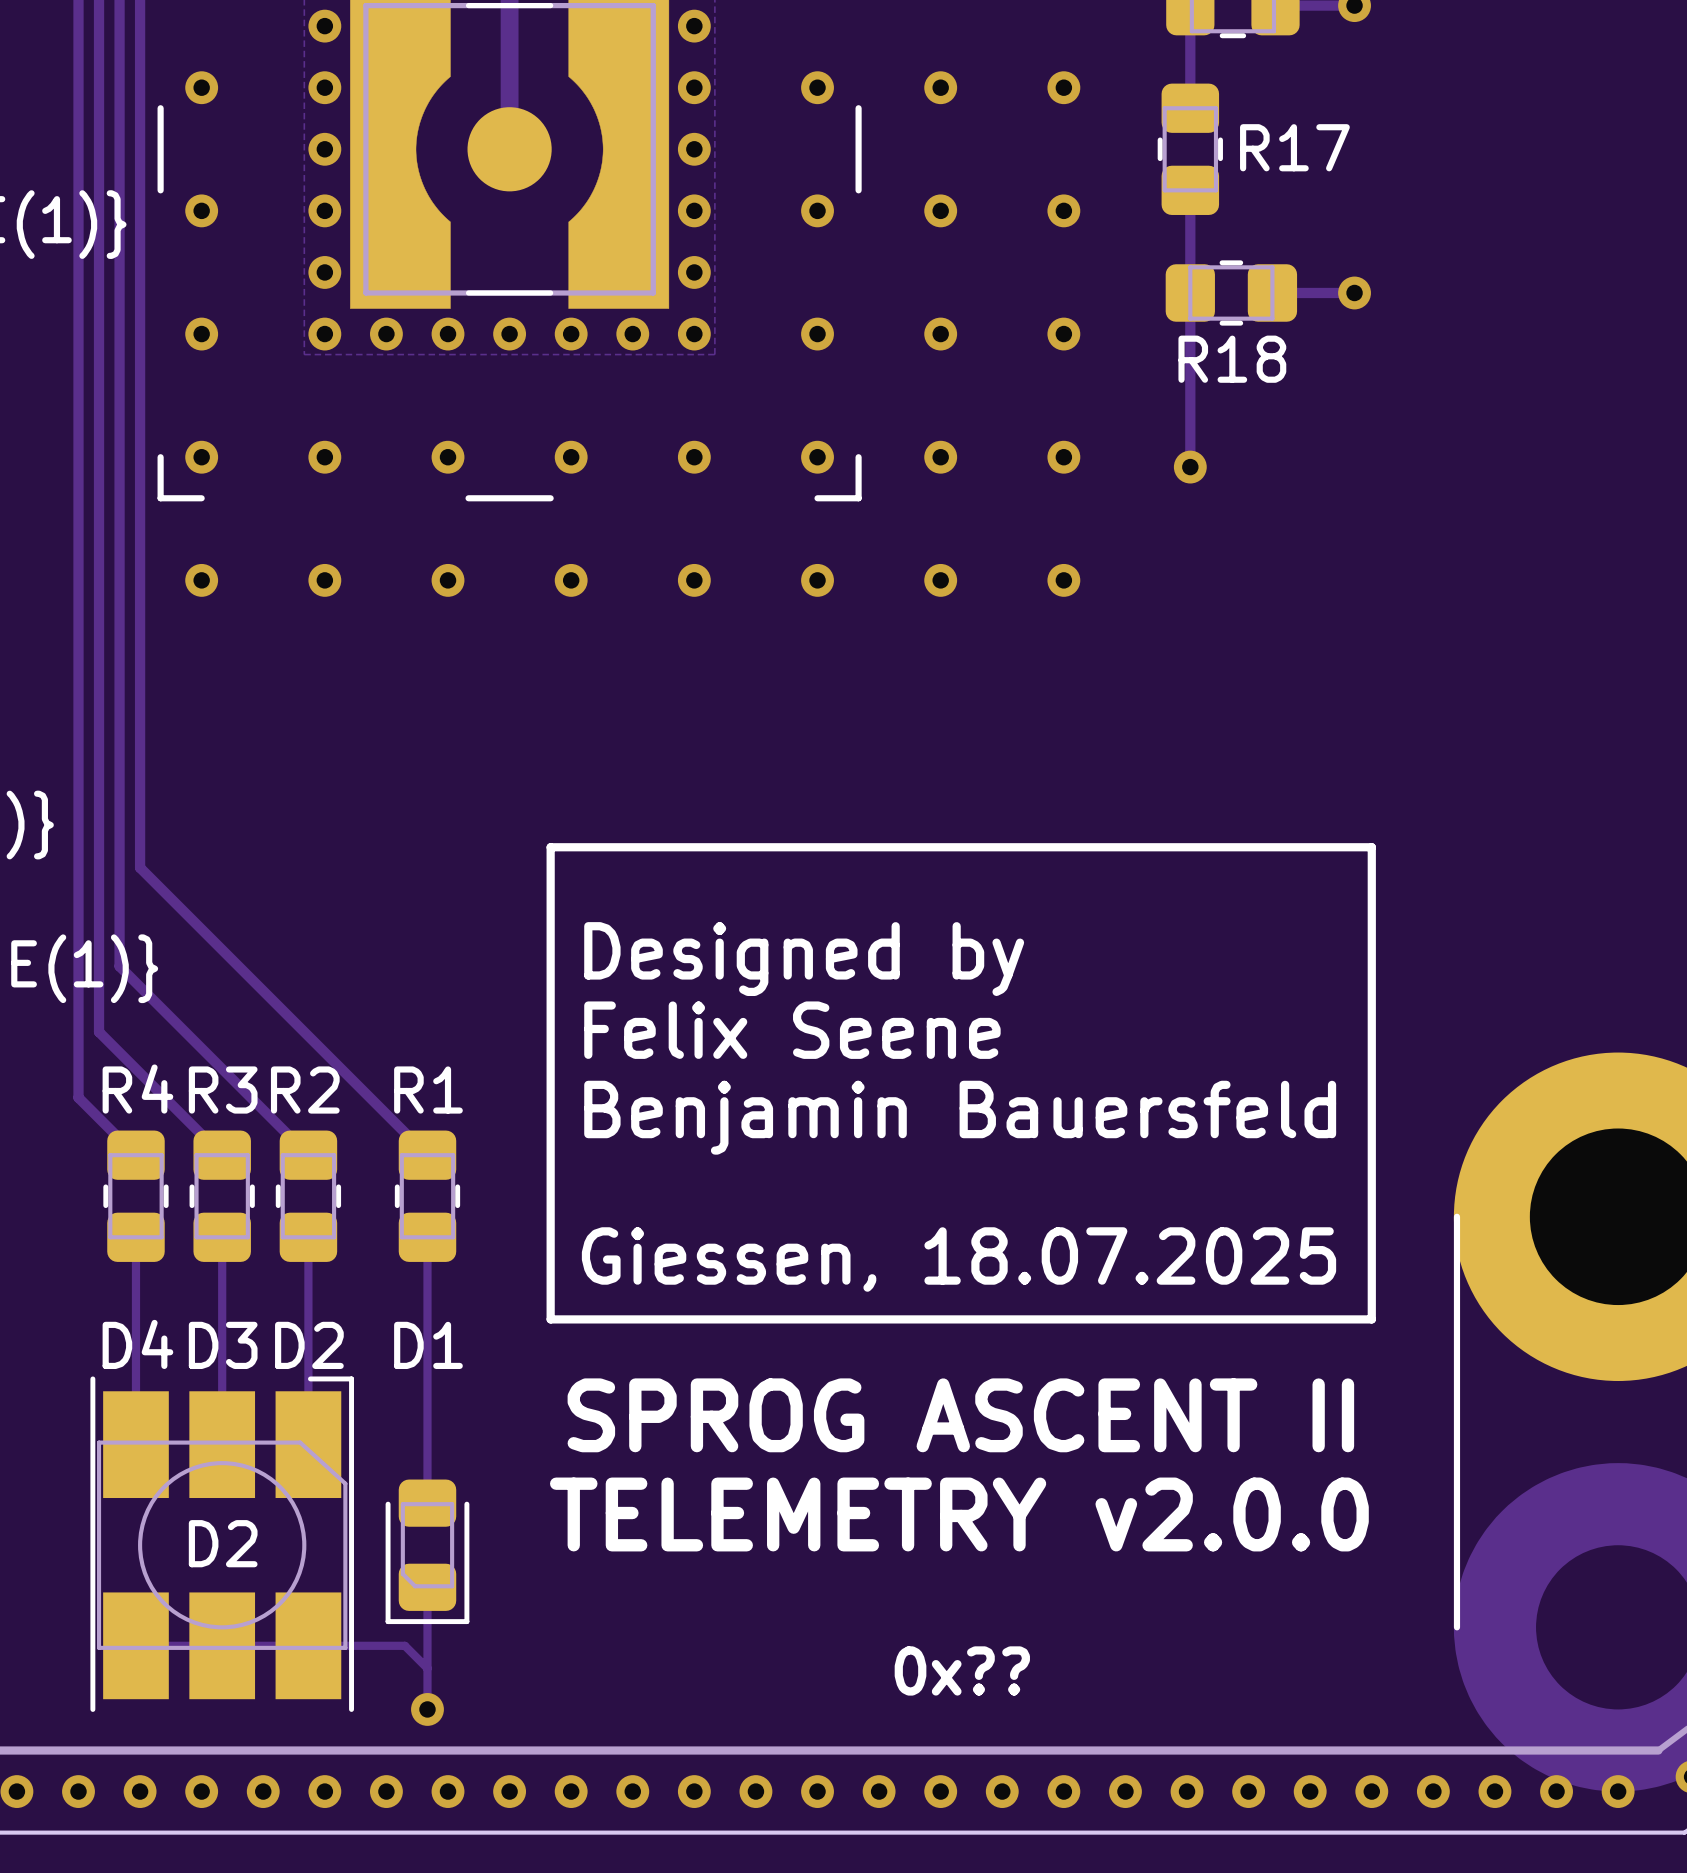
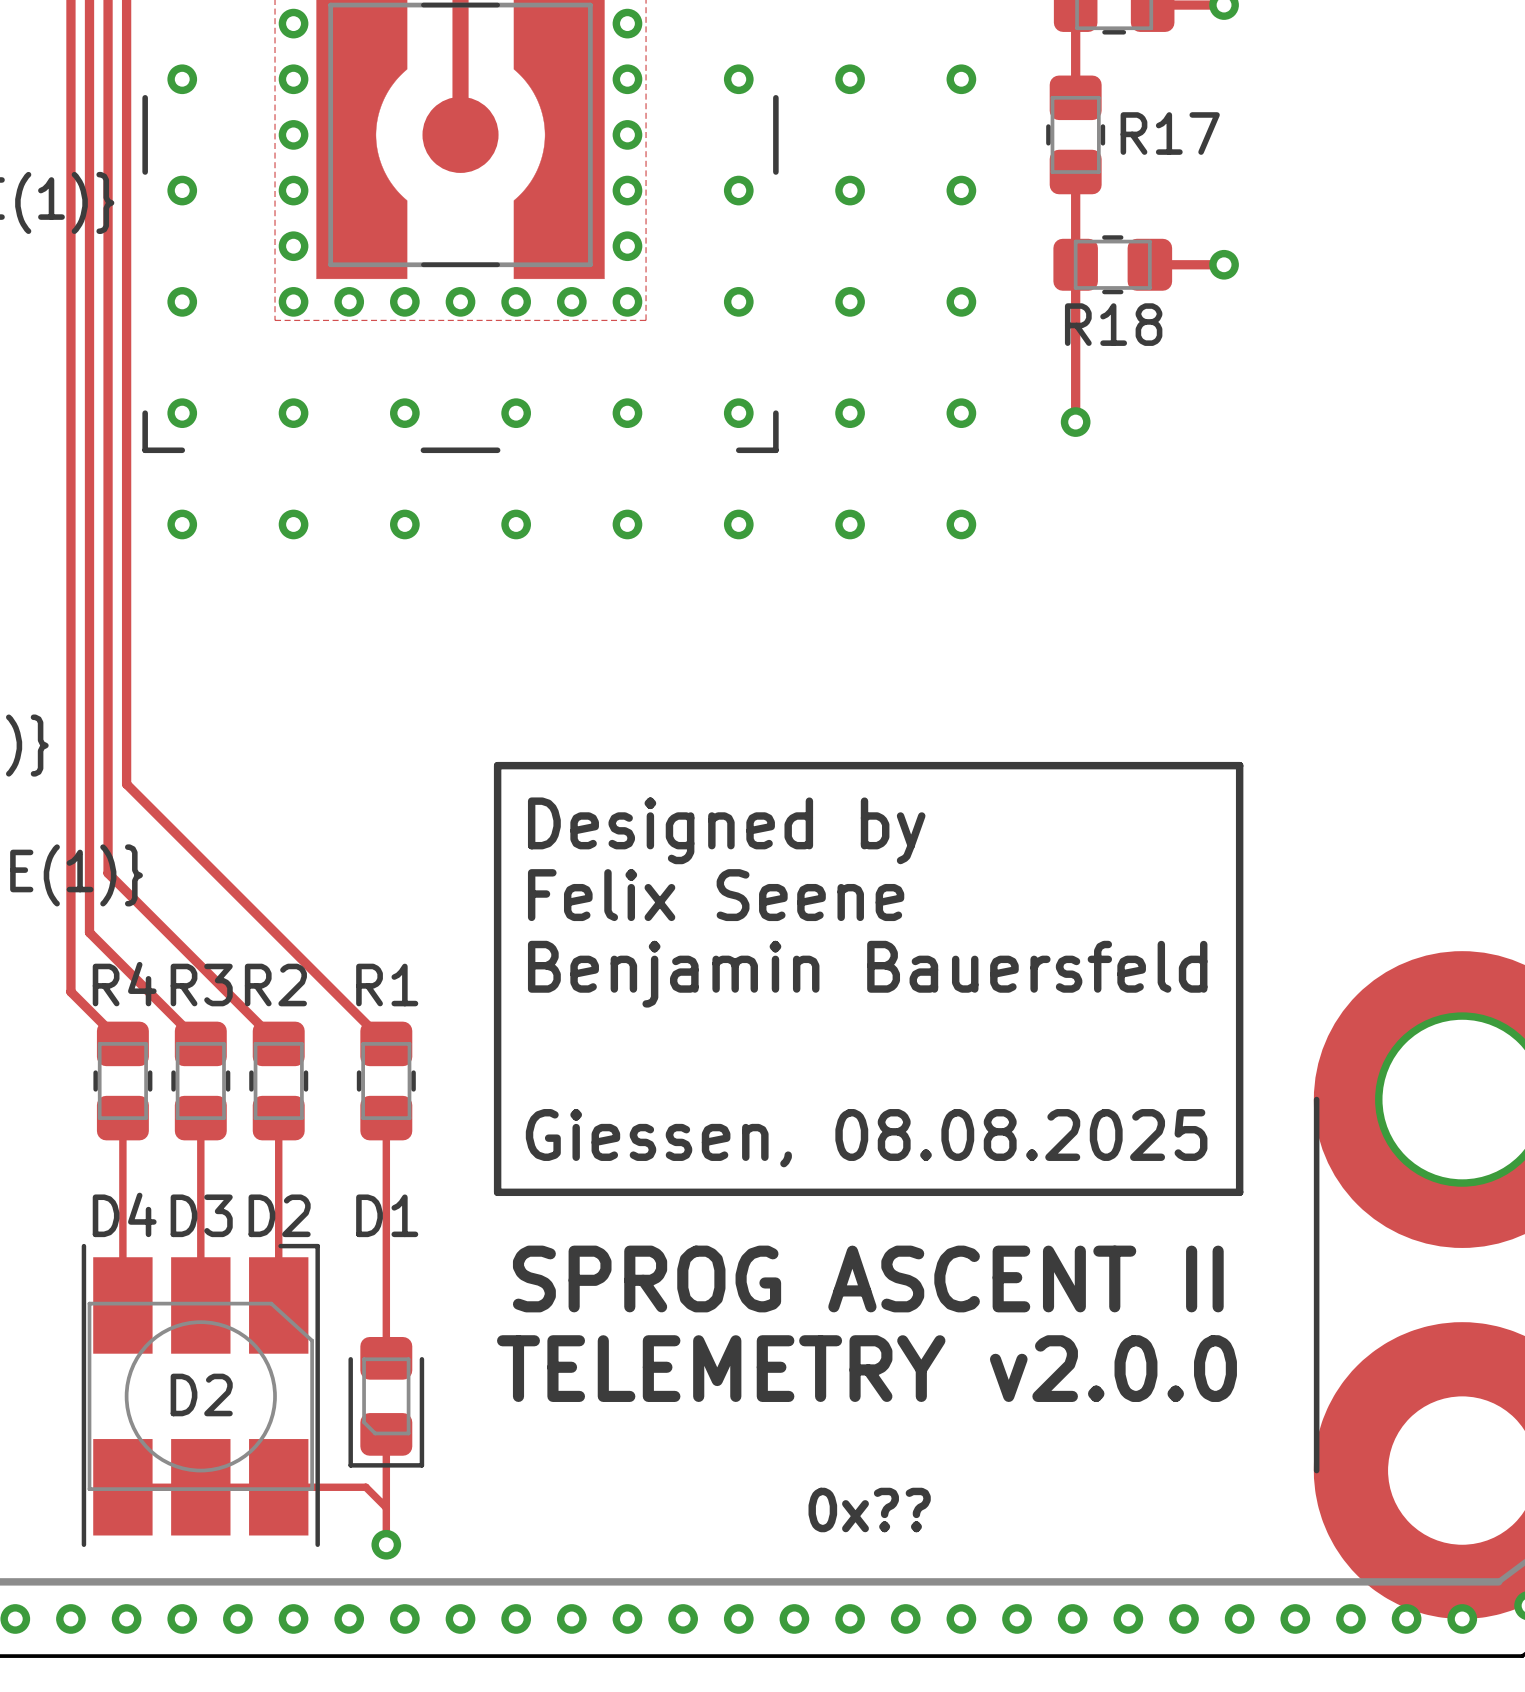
text position: Designed by (804, 959) -> Designed by (726, 830)
text position: Felix Seene (792, 1030) -> Felix Seene (716, 895)
text position: Benjamin Bauersfeld (960, 1117) -> Benjamin Bauersfeld (867, 974)
text: Giessen, 18.07.2025 (959, 1259) -> Giessen, 08.08.2025 (866, 1138)

